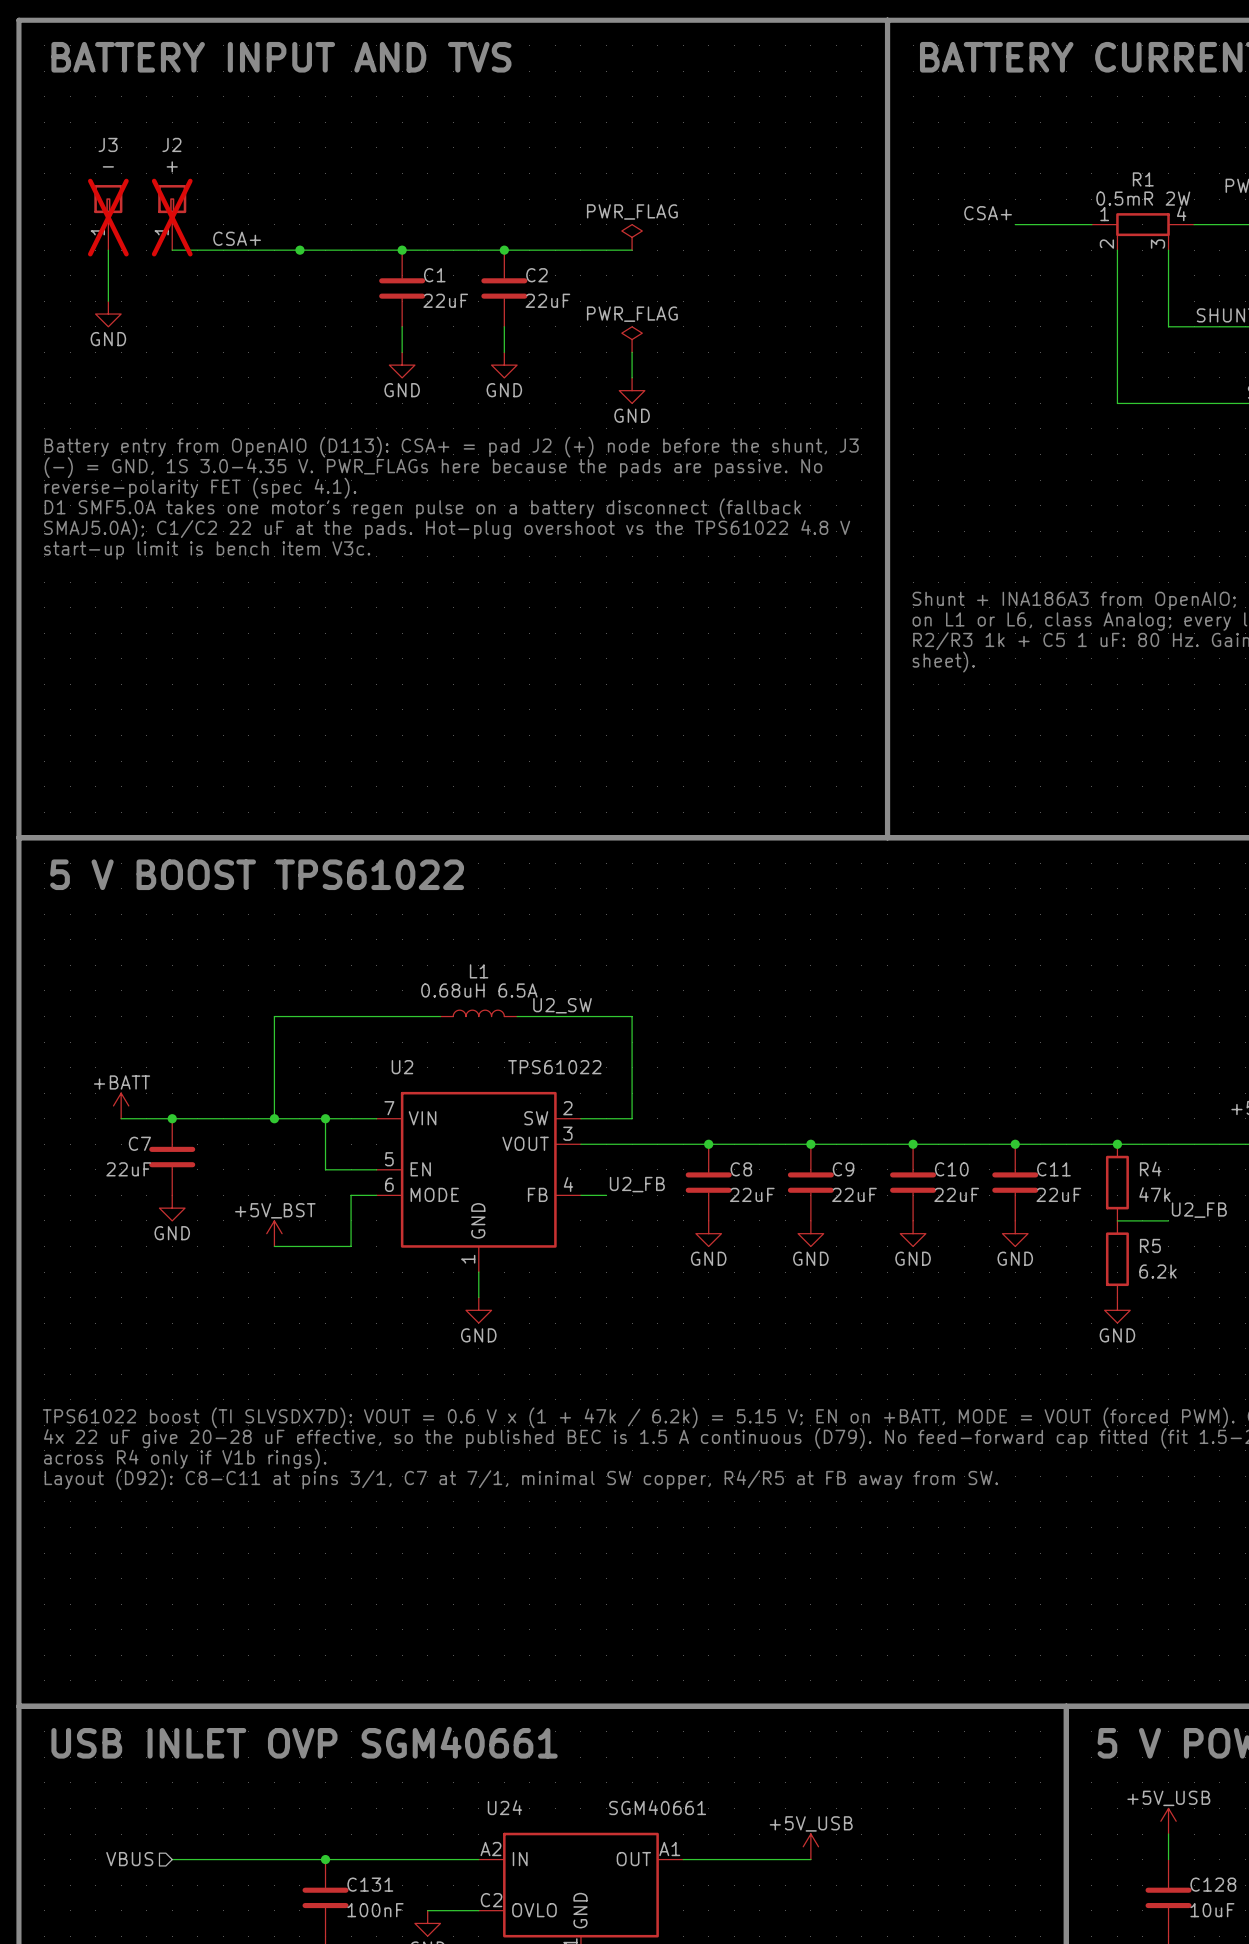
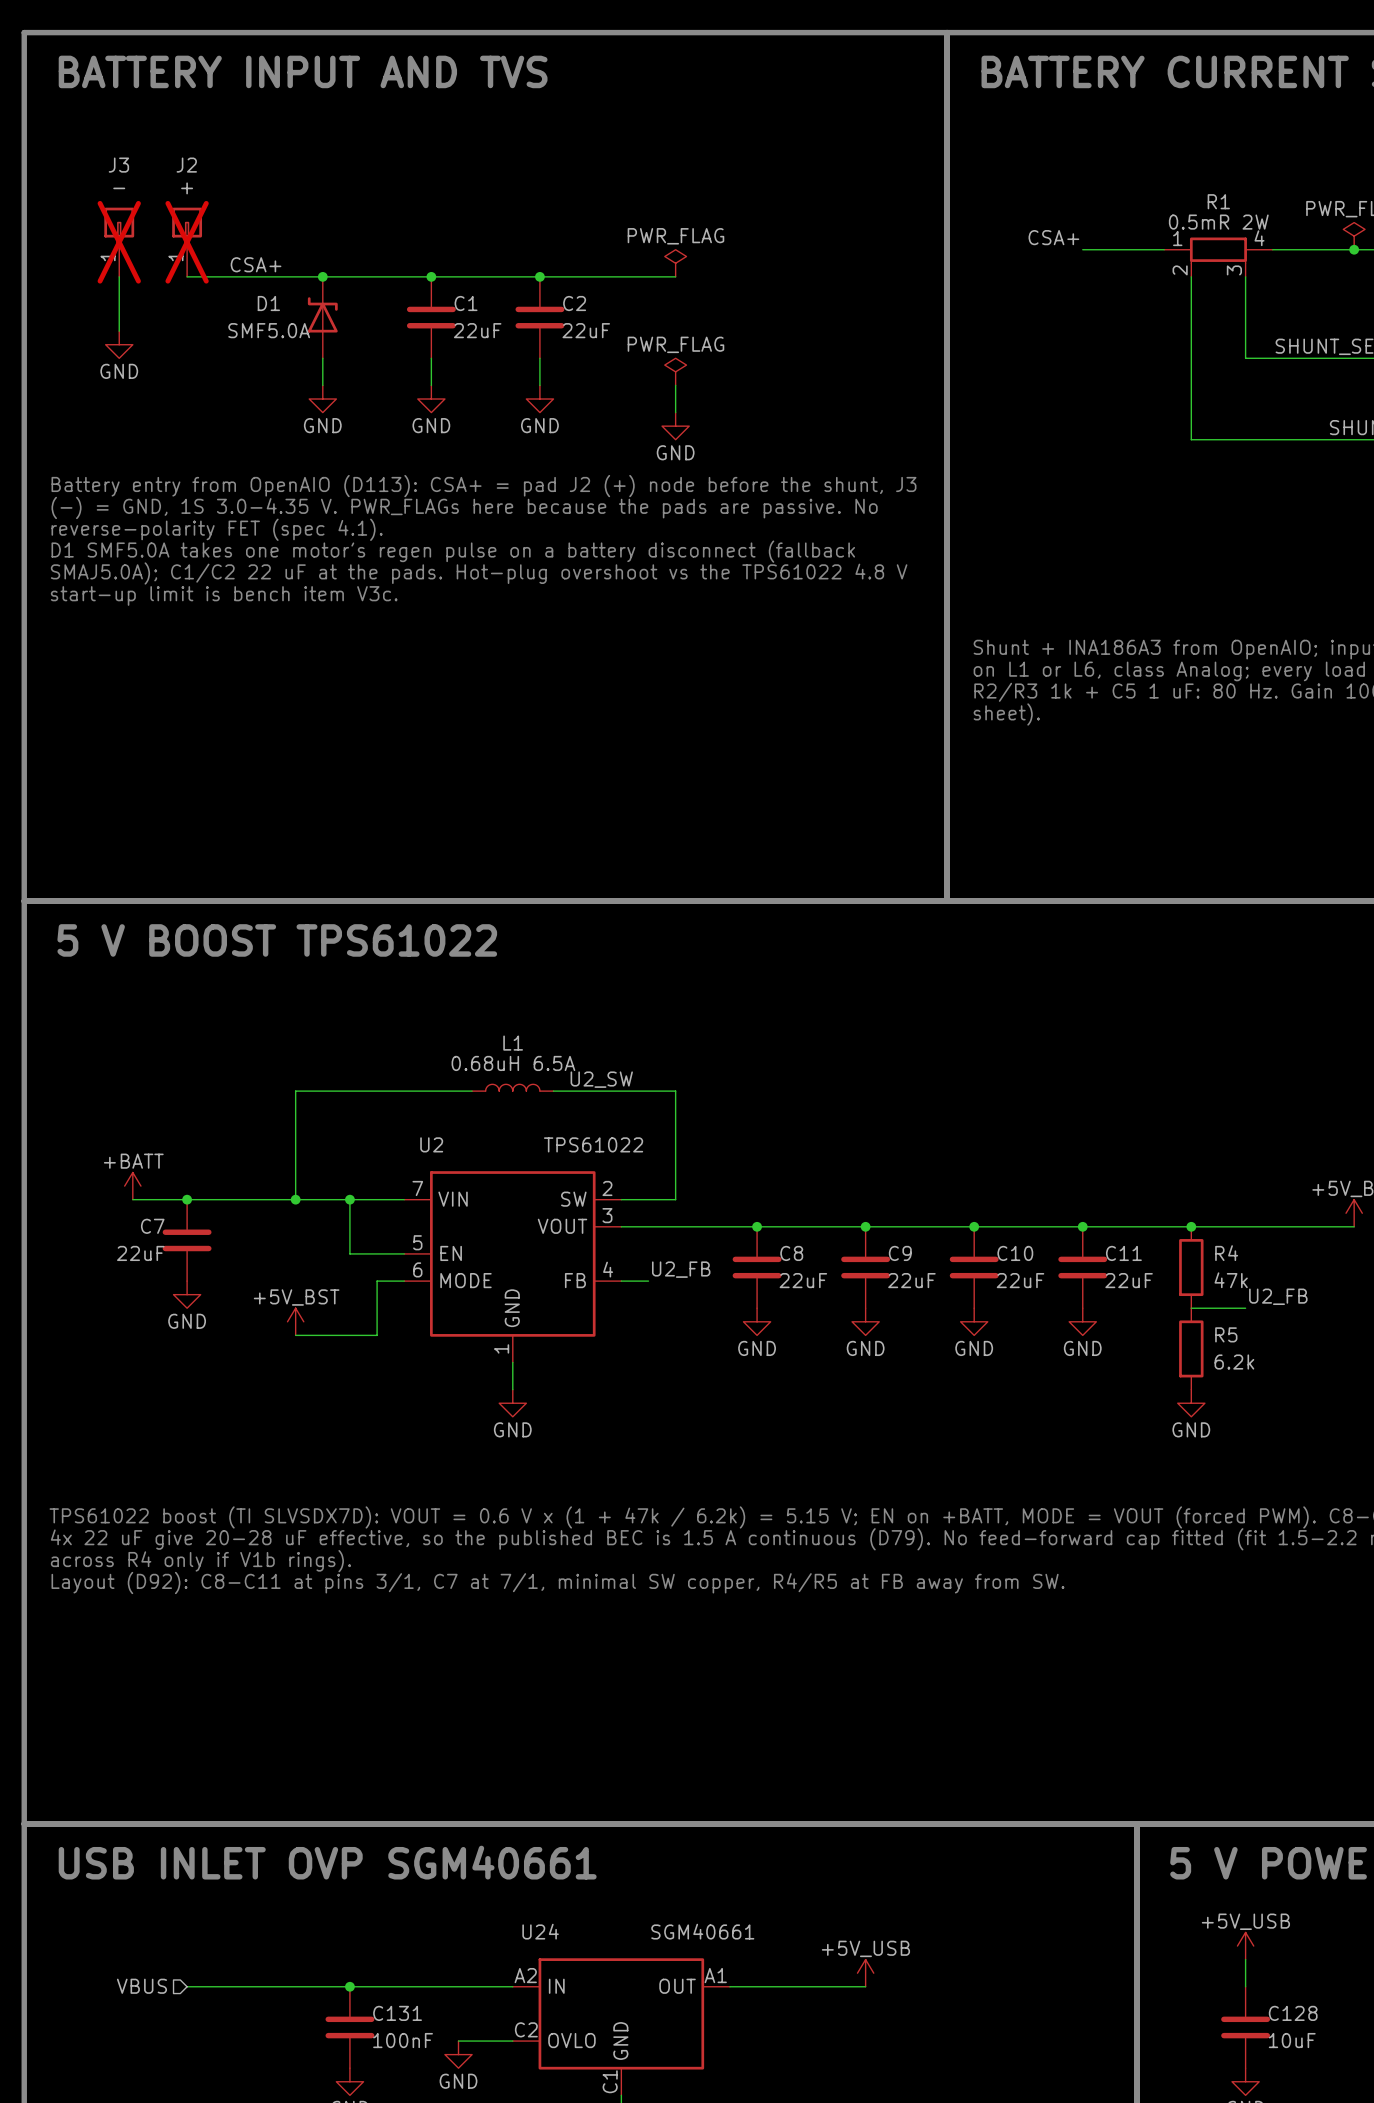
D1: none -> SMF5.0A (322, 317)
wire: none -> (322, 358) (322, 385)
power symbol: none -> GND (322, 399)

